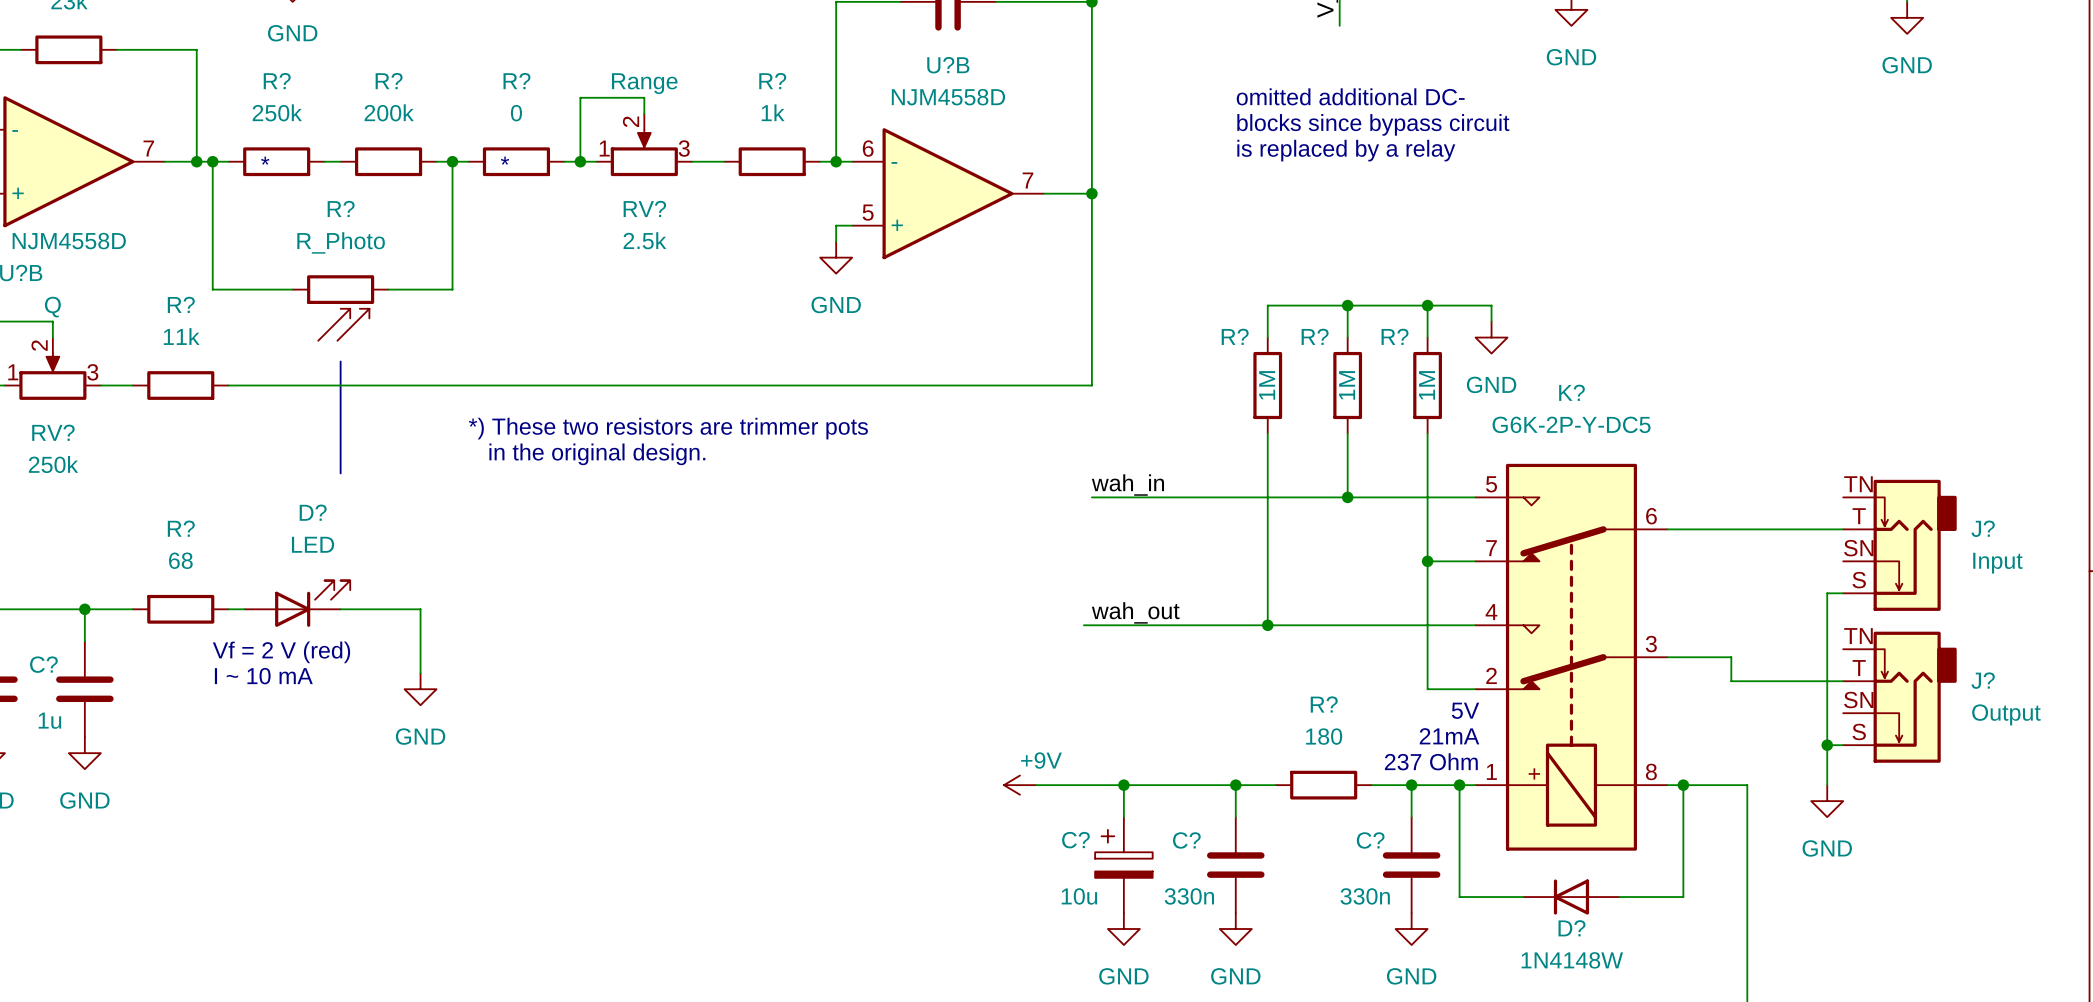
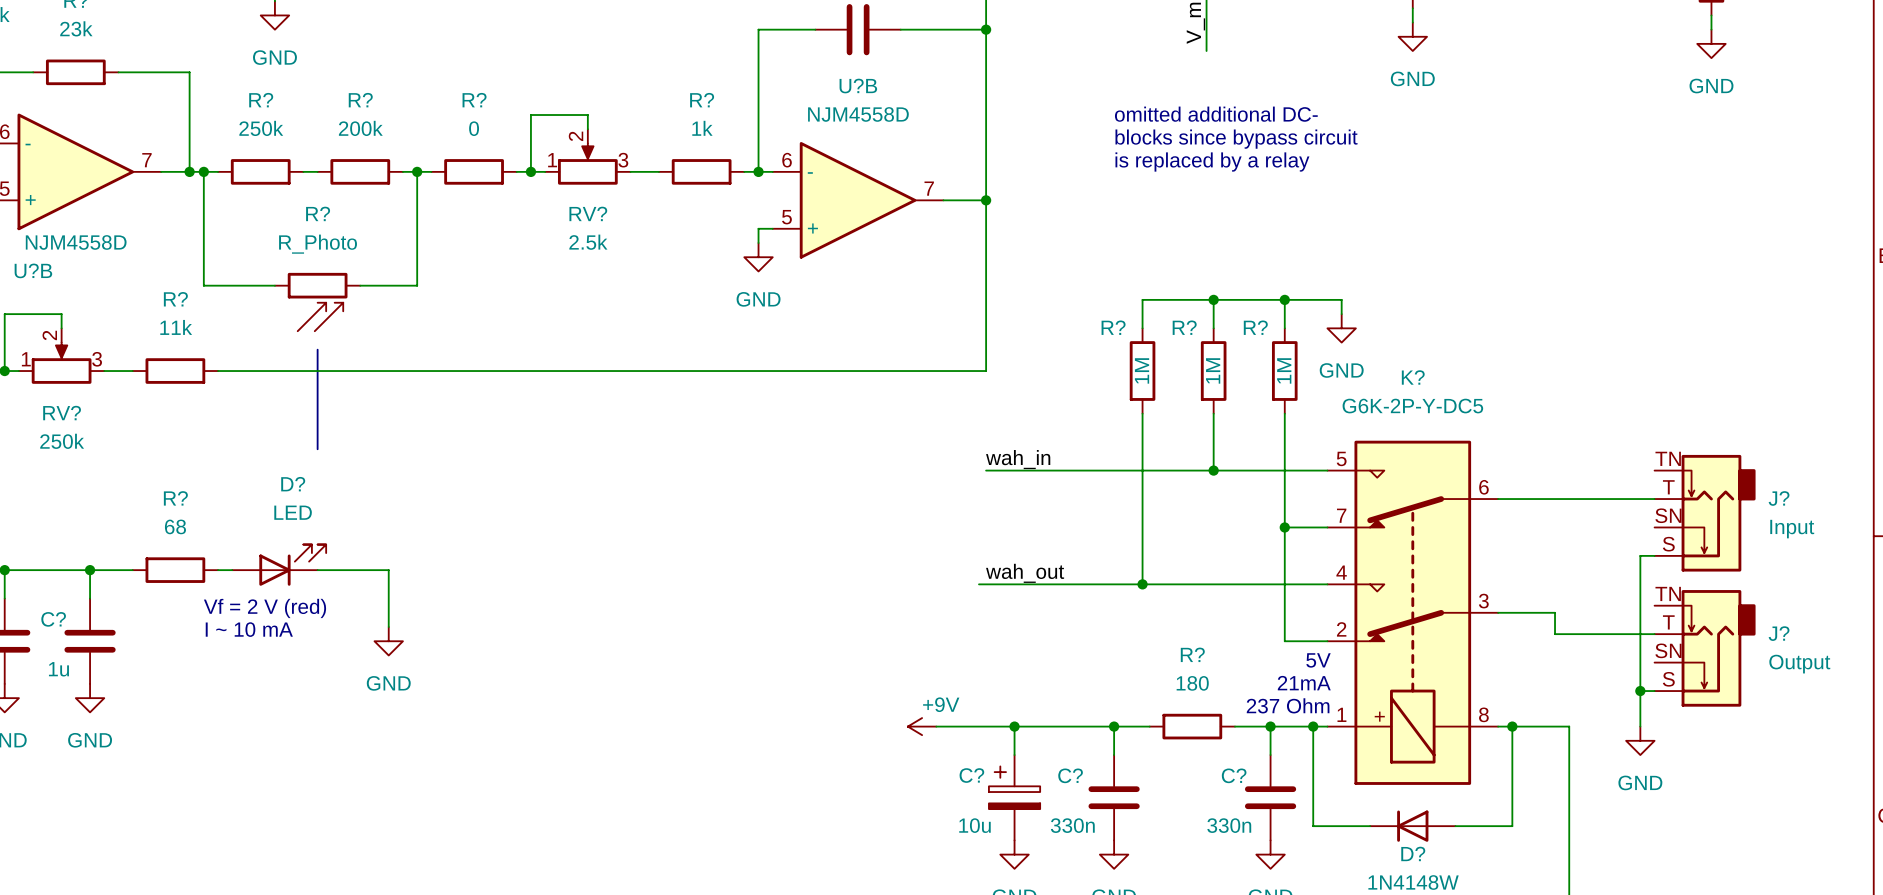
RV? text: Range (644, 83) -> none
text: * (265, 160) -> none
text: * (505, 160) -> none
RV? text: Q (52, 307) -> none
text: *) These two resistors are trimmer pots (668, 428) -> none
text: in the original design. (597, 454) -> none

